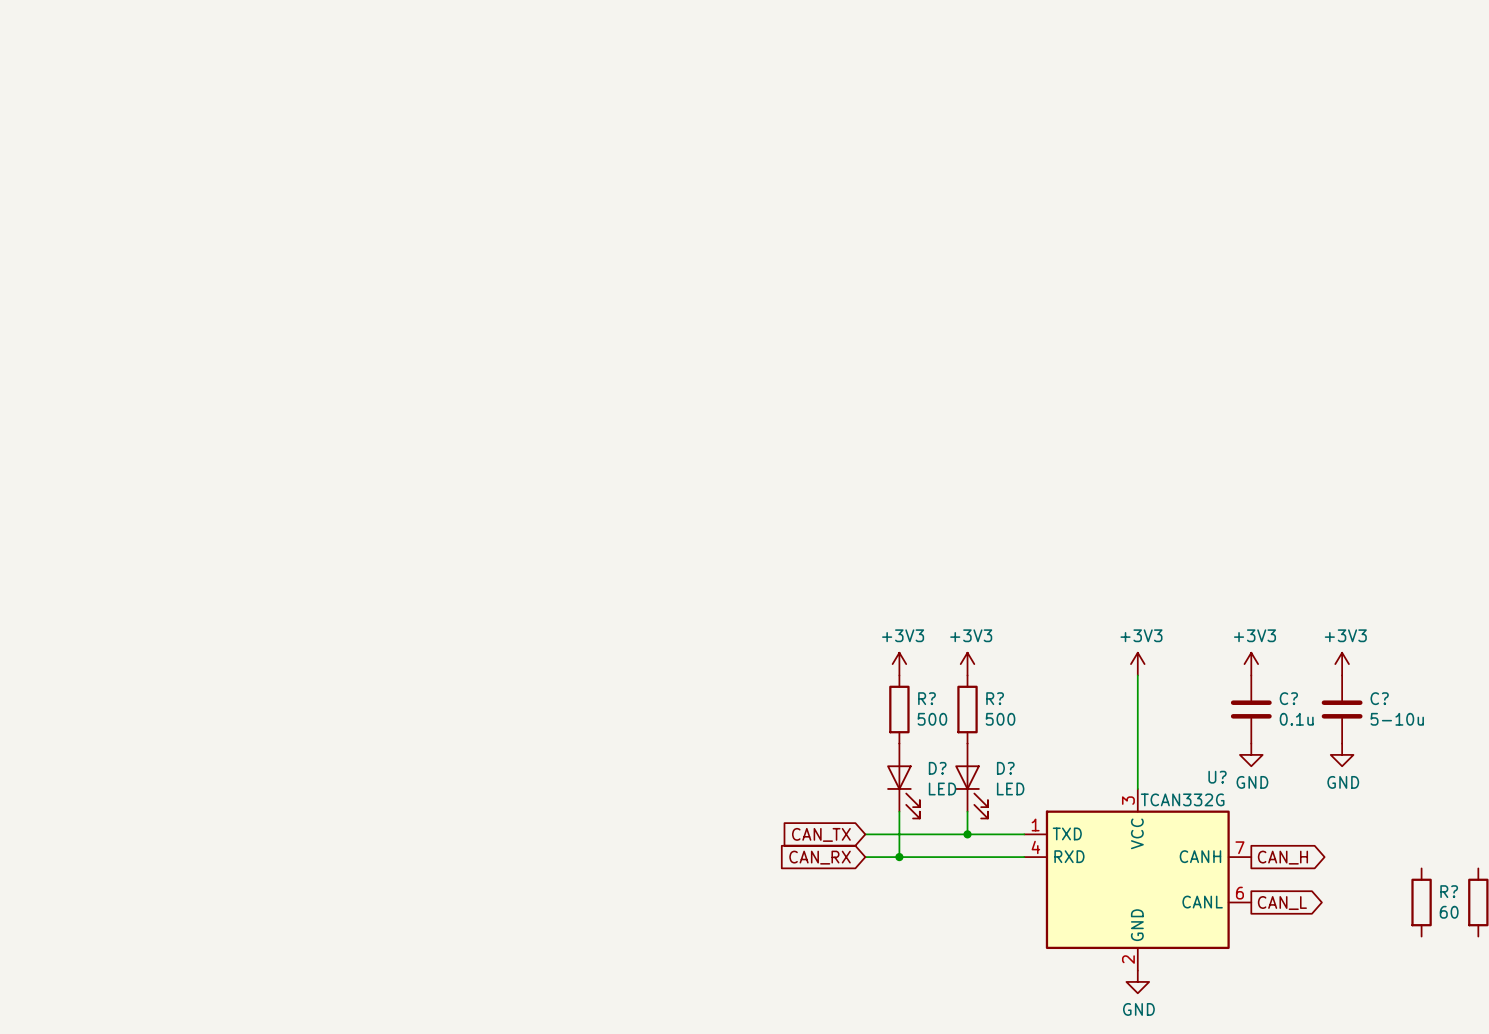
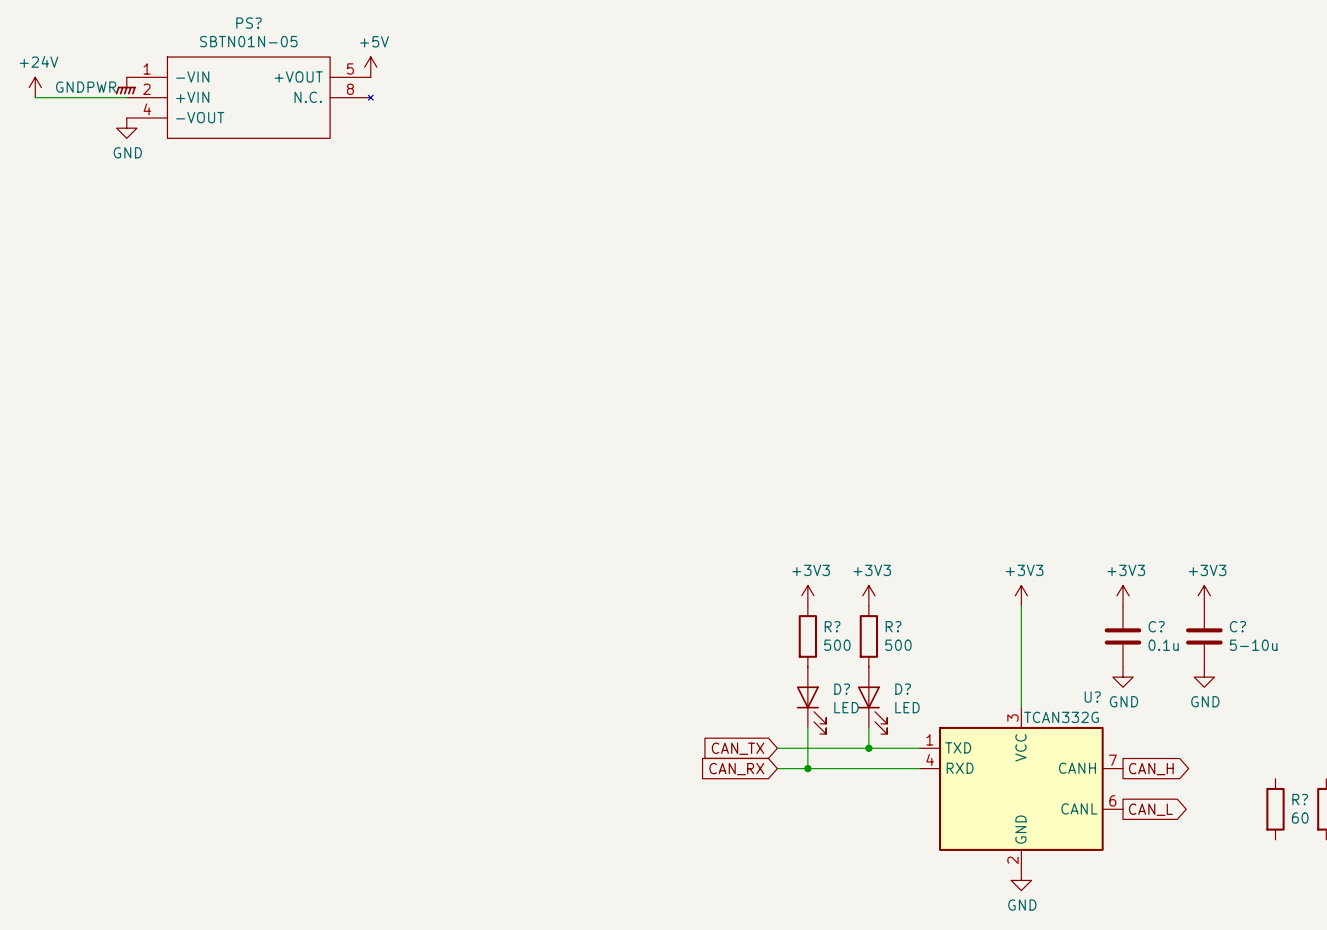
power symbol: none -> +5V (370, 67)
power symbol: none -> GNDPWR (125, 85)
power symbol: none -> +24V (35, 87)
wire: none -> (35, 97) (126, 97)
PS?: none -> SBTN01N-05 (249, 97)
power symbol: none -> GND (126, 128)

